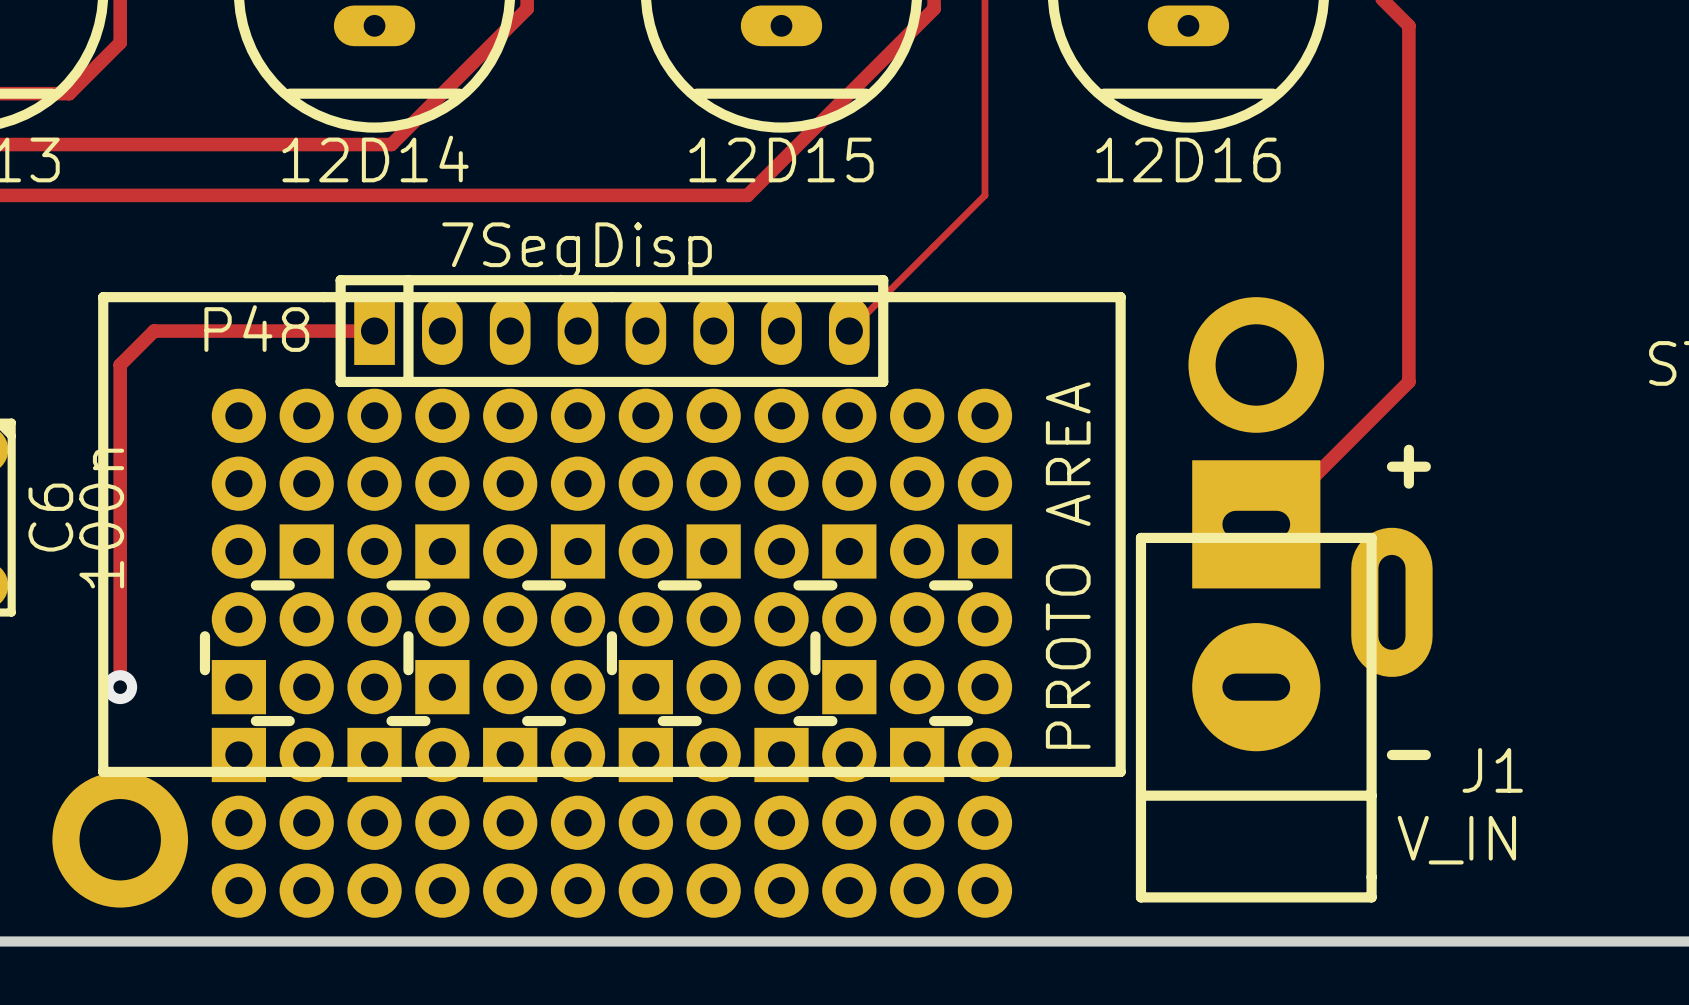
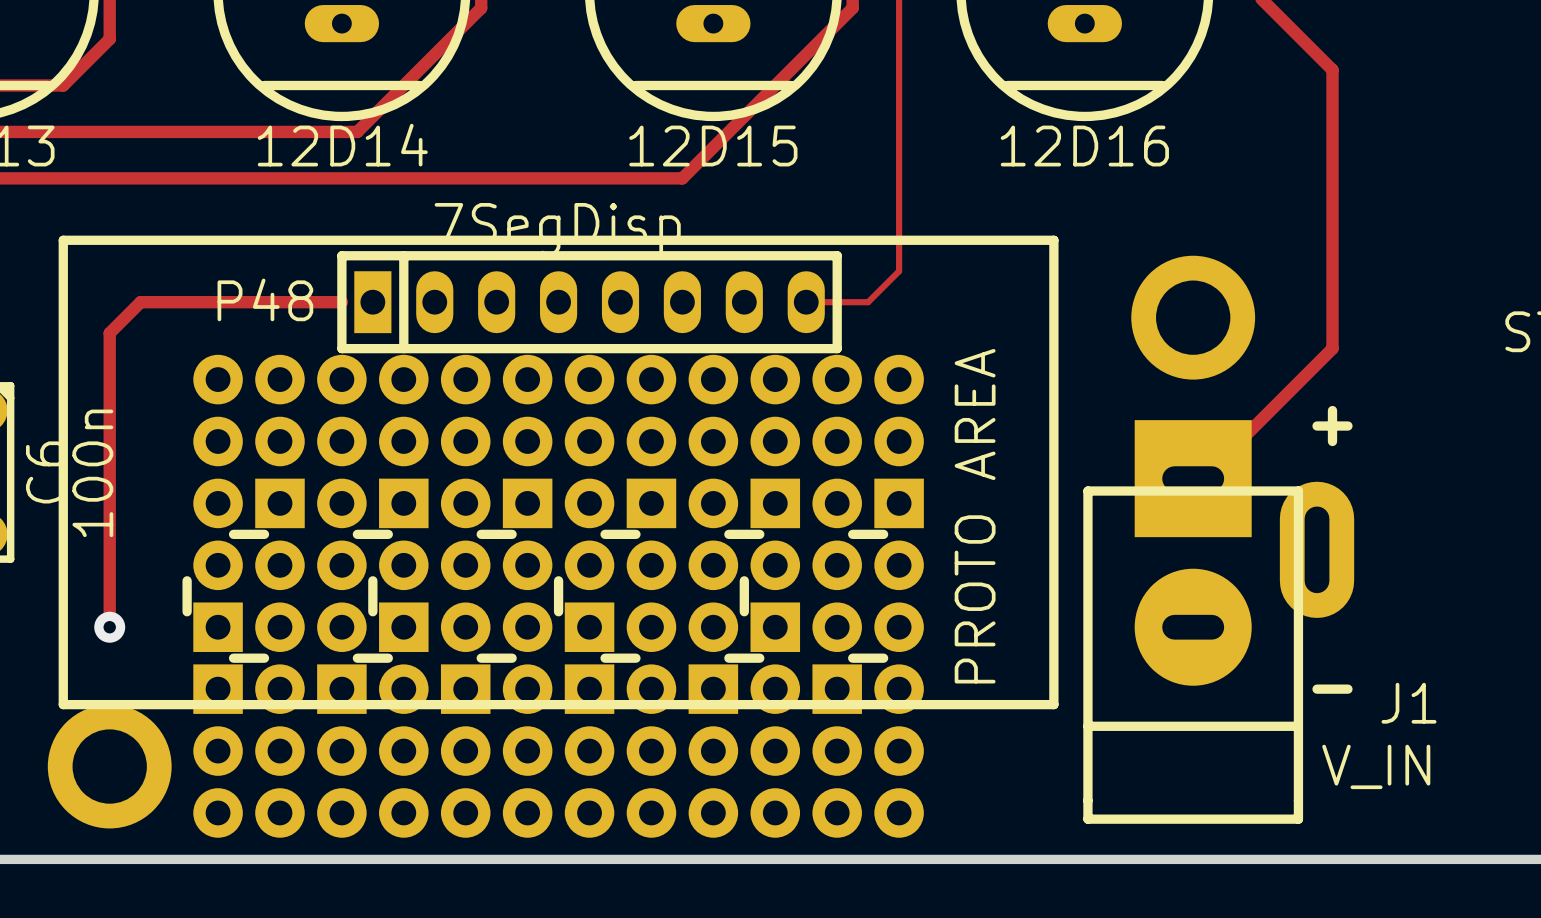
track: (1408, 25) (1408, 381) (1267, 523) (1256, 524) -> (1286, 23) (1332, 70) (1332, 348) (1208, 472) (1193, 478)
track: (984, 195) (849, 331) -> (899, 178) (899, 271) (868, 302) (806, 302)
P48 position: (611, 331) -> (589, 302)
part position: (1256, 364) -> (1193, 317)
J1 position: (1284, 673) -> (1218, 614)
line: (103, 771) (103, 297) (1120, 297) (1120, 771) -> (94, 704) (63, 704) (63, 240) (1053, 240) (1053, 704) (1022, 704)

